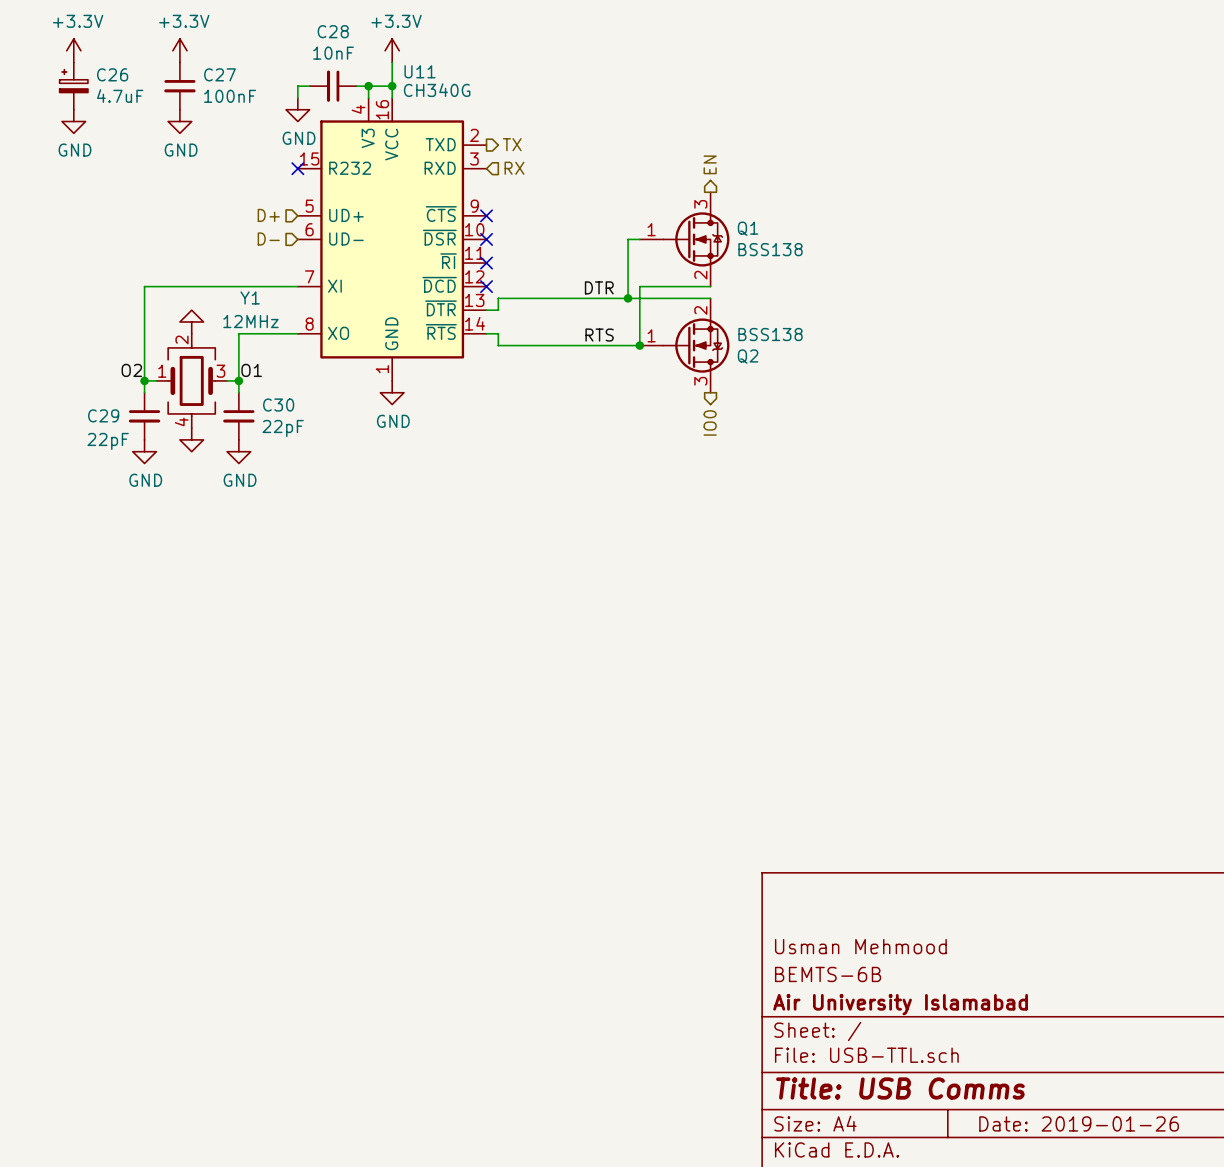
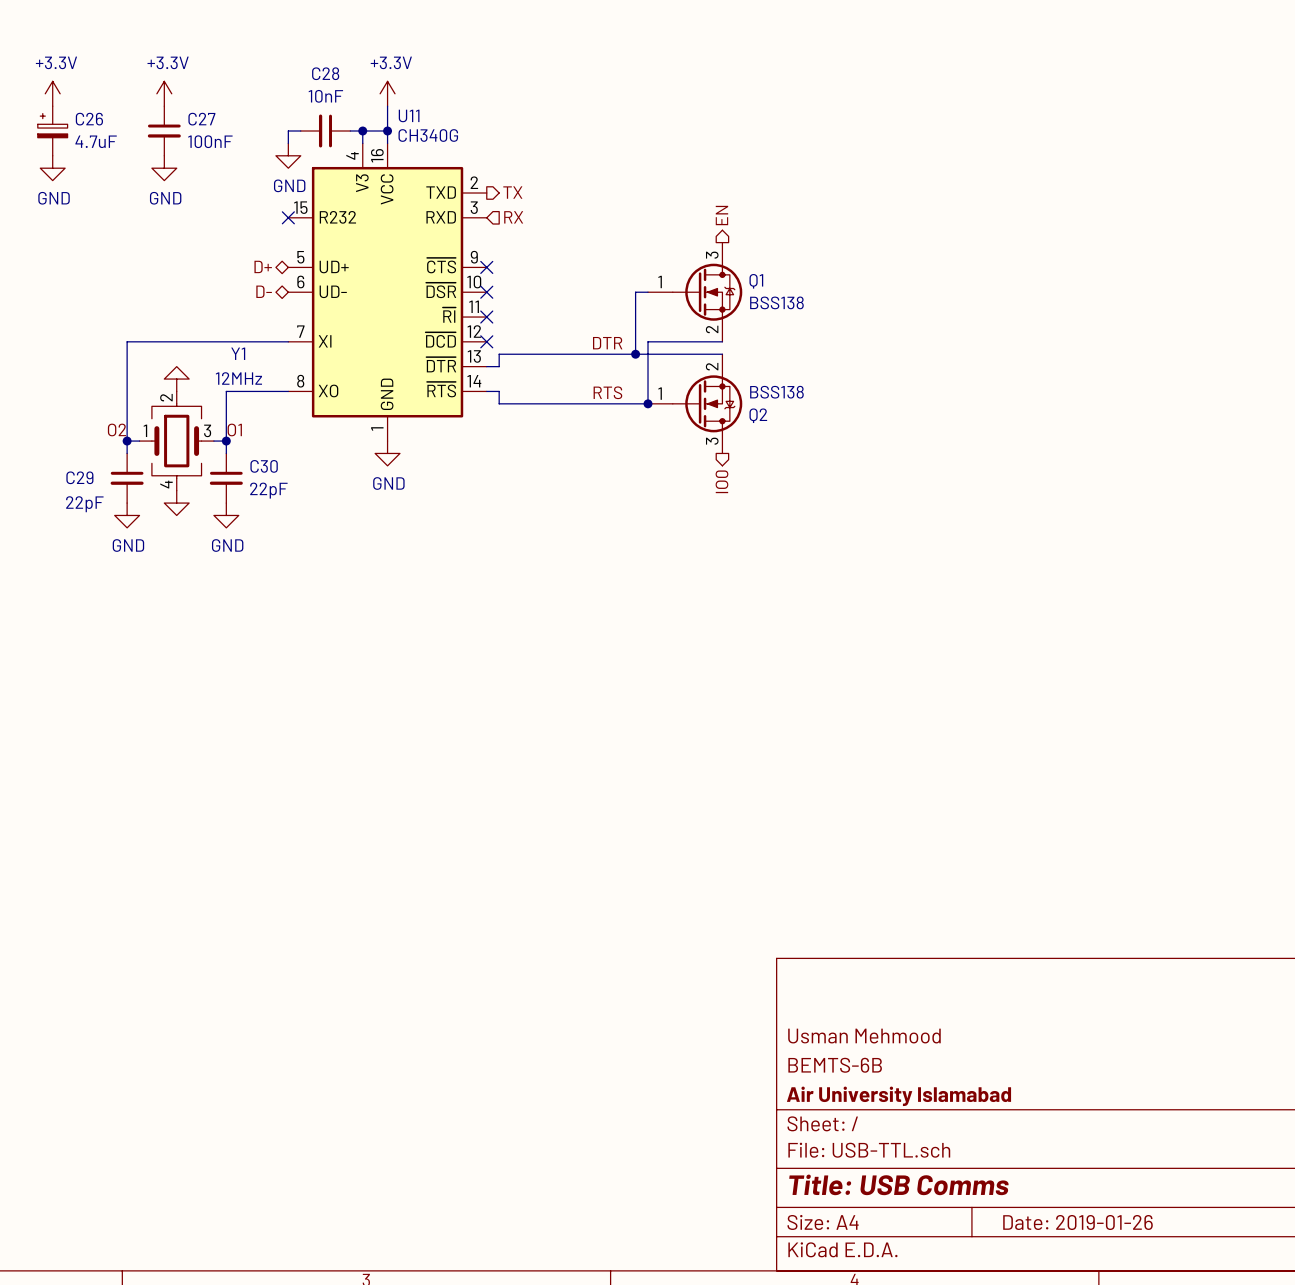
hierarchical label shape: input (268, 215) -> bidirectional (263, 266)
hierarchical label shape: input (268, 239) -> bidirectional (264, 291)

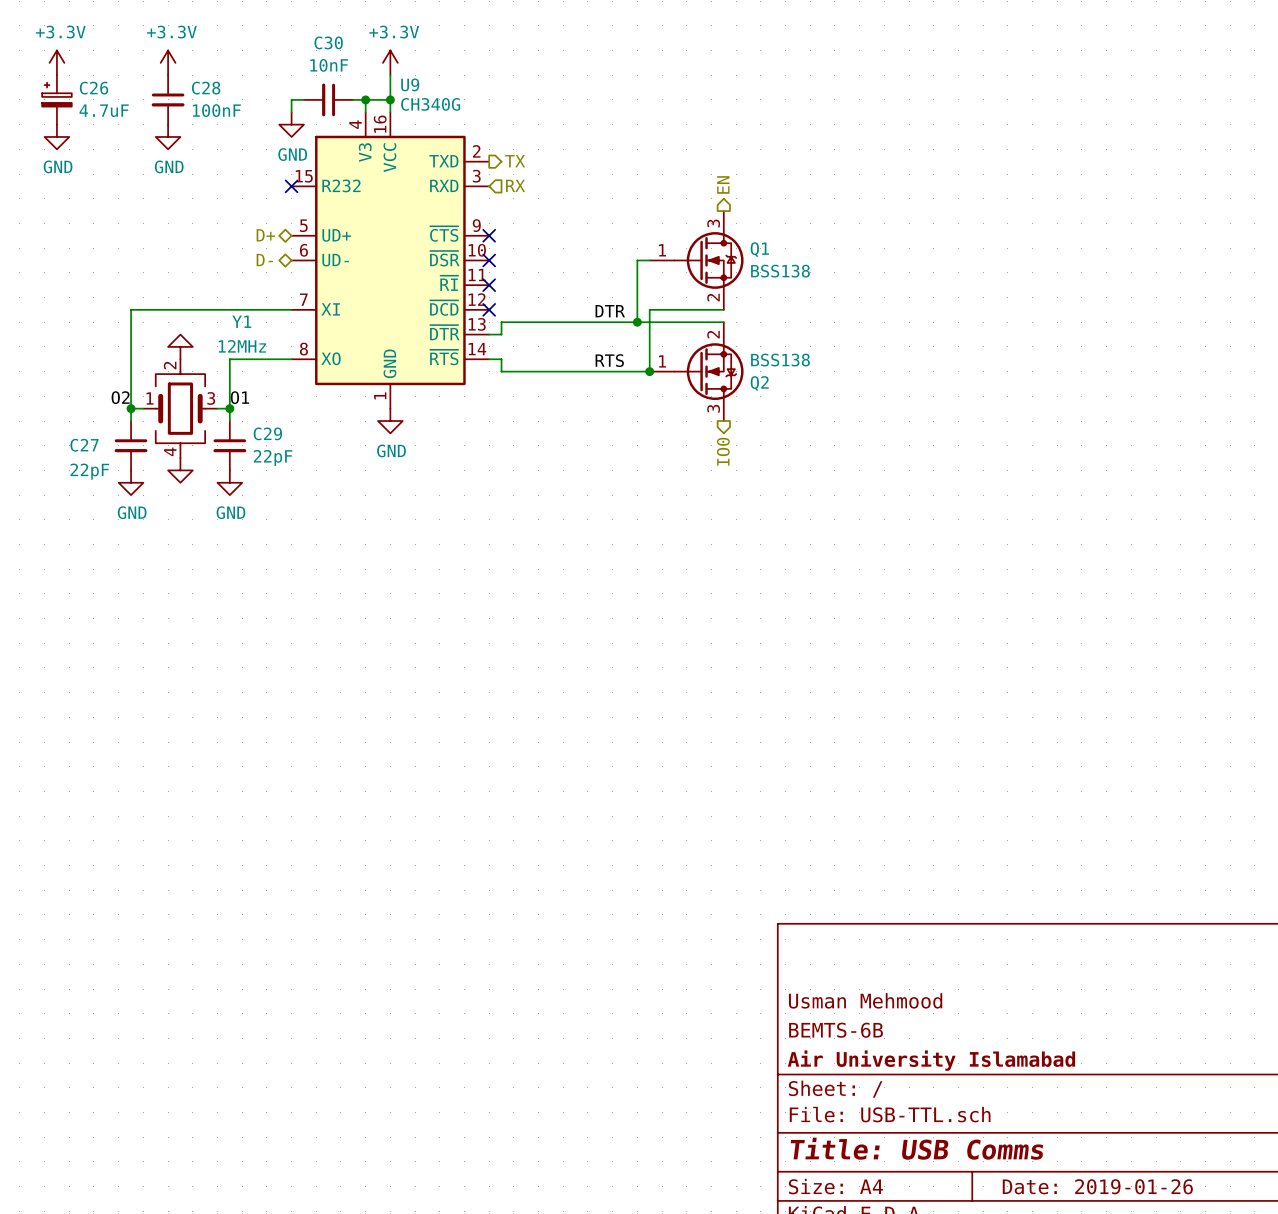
C28 name: C28 (325, 73) -> C30 (328, 42)
U11 name: U11 (409, 115) -> U9 (410, 84)
C27 name: C27 (201, 119) -> C28 (206, 88)
C30 name: C30 (264, 466) -> C29 (267, 433)
C29 name: C29 (79, 477) -> C27 (84, 445)

